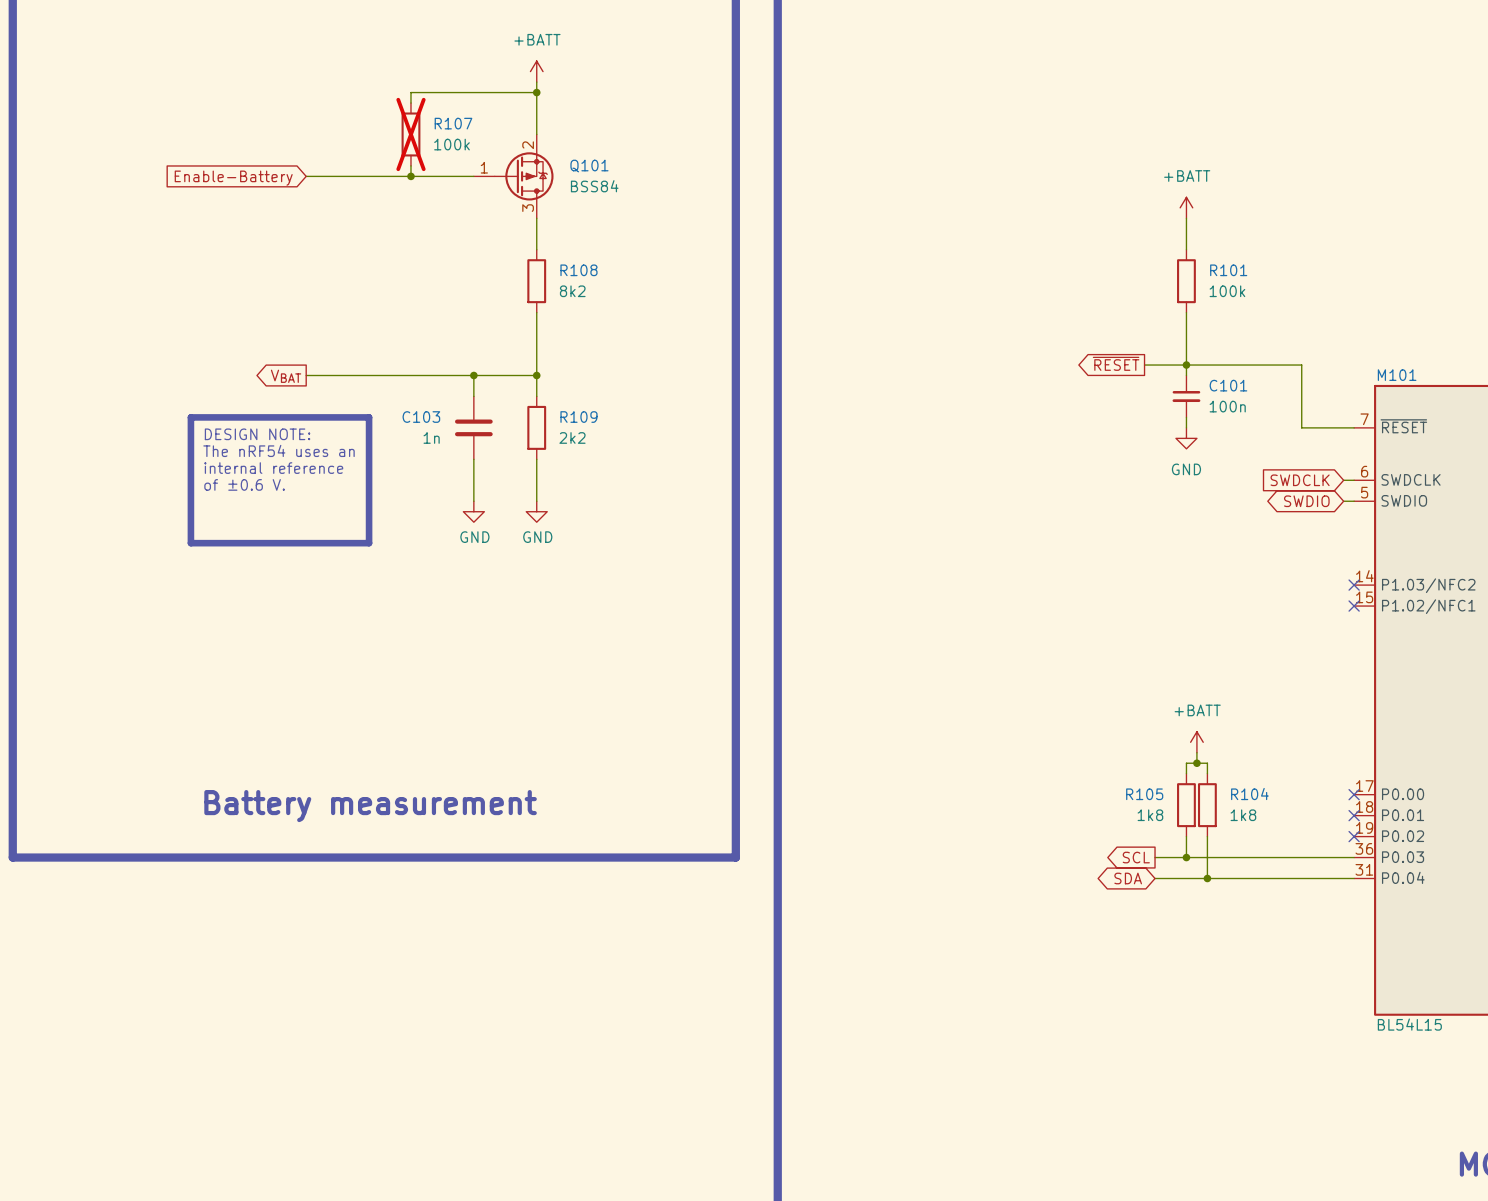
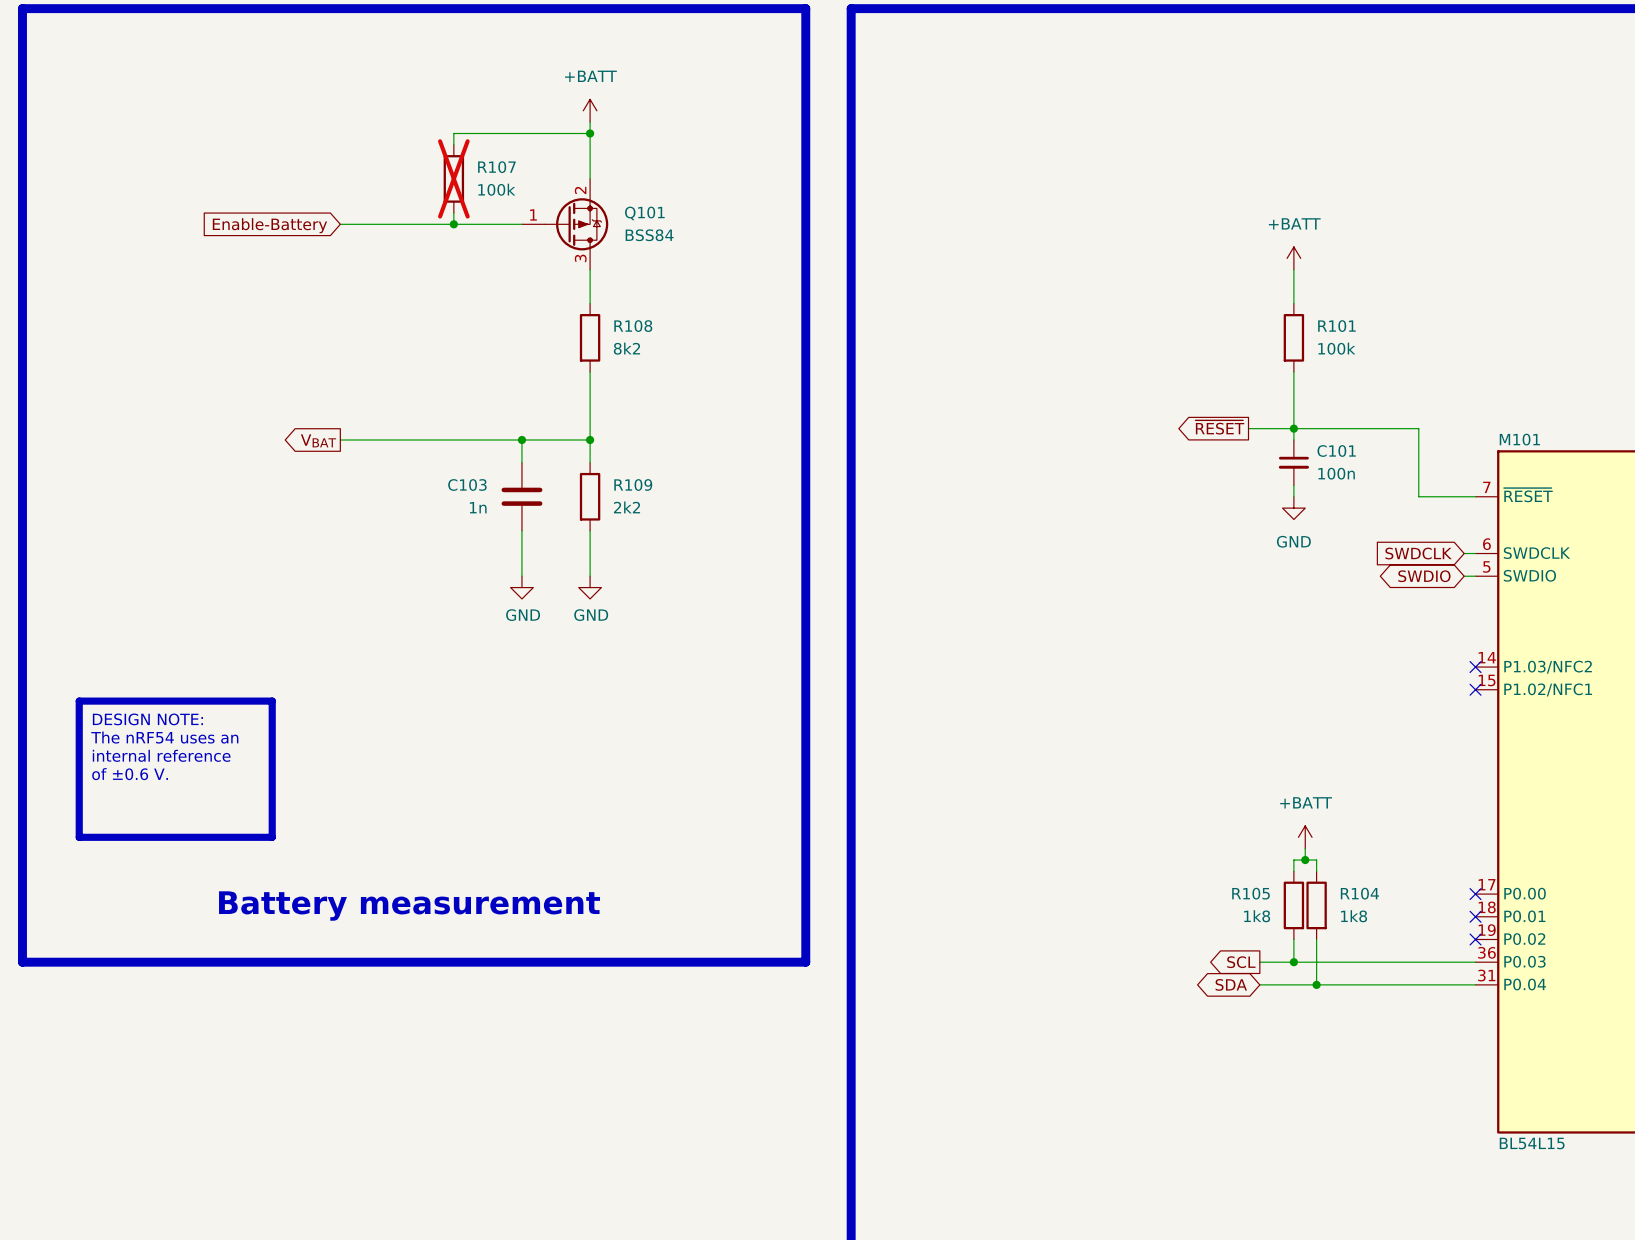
line: (190, 417) (369, 417) (369, 543) (190, 543) (190, 417) -> none
text: DESIGN NOTE: (257, 434) -> none
text: The nRF54 uses an (279, 450) -> none
text: internal reference (273, 468) -> none
text: of ±0.6 V. (244, 484) -> none
line: none -> (79, 701) (272, 701) (272, 837) (79, 837) (79, 701)
text: none -> DESIGN NOTE: (147, 719)
text: none -> The nRF54 uses an (164, 737)
text: none -> internal reference (161, 755)
text: none -> of ±0.6 V. (130, 774)

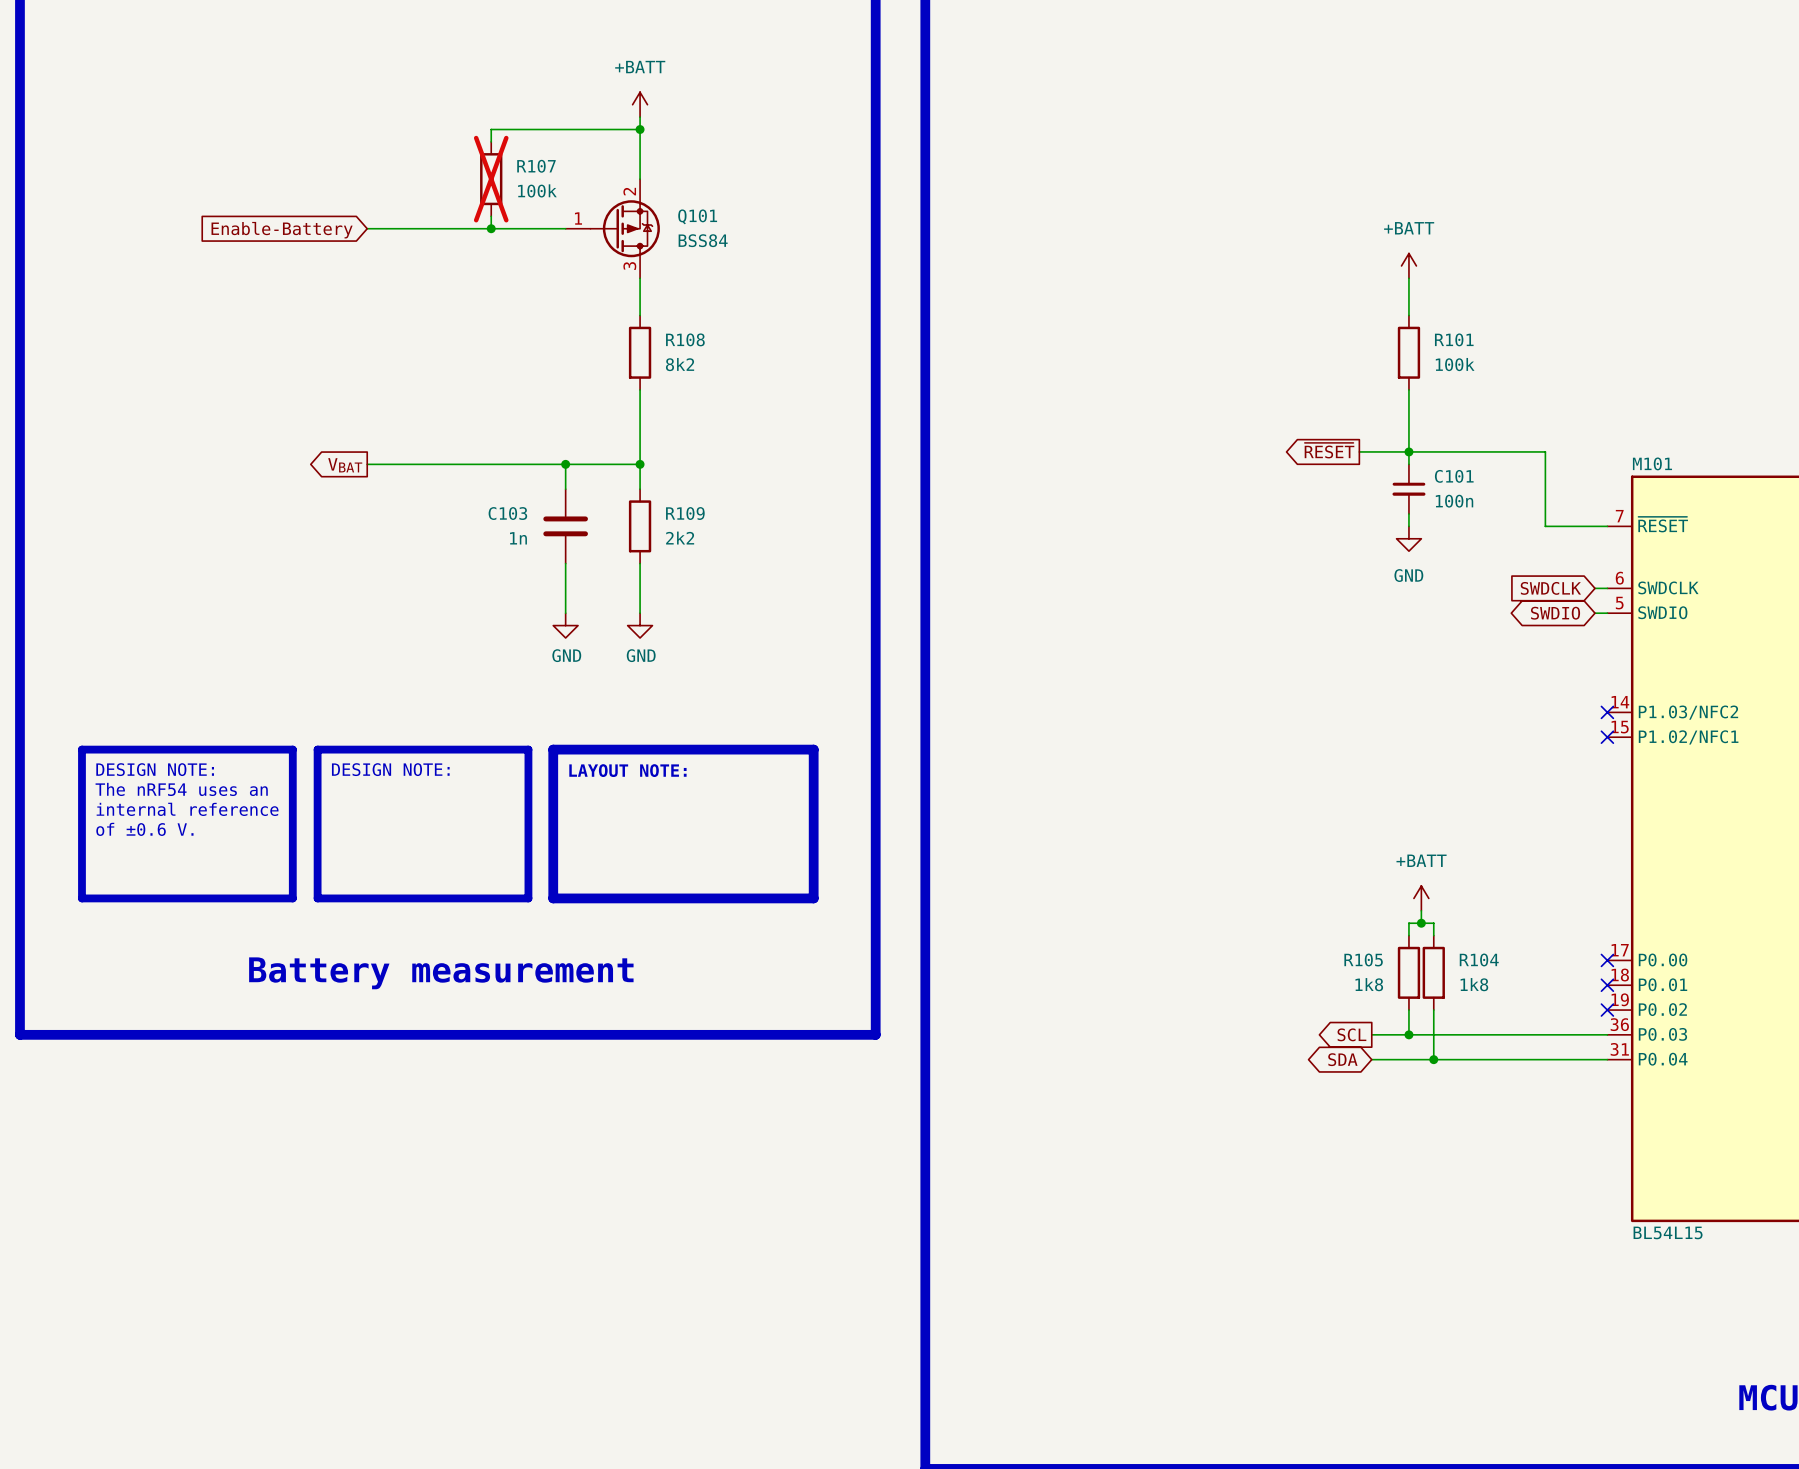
line: none -> (317, 749) (528, 749) (528, 898) (317, 898) (317, 749)
line: none -> (553, 749) (813, 749) (813, 898) (553, 898) (553, 749)
text: none -> DESIGN NOTE: (390, 769)
text: none -> LAYOUT NOTE: (627, 770)

